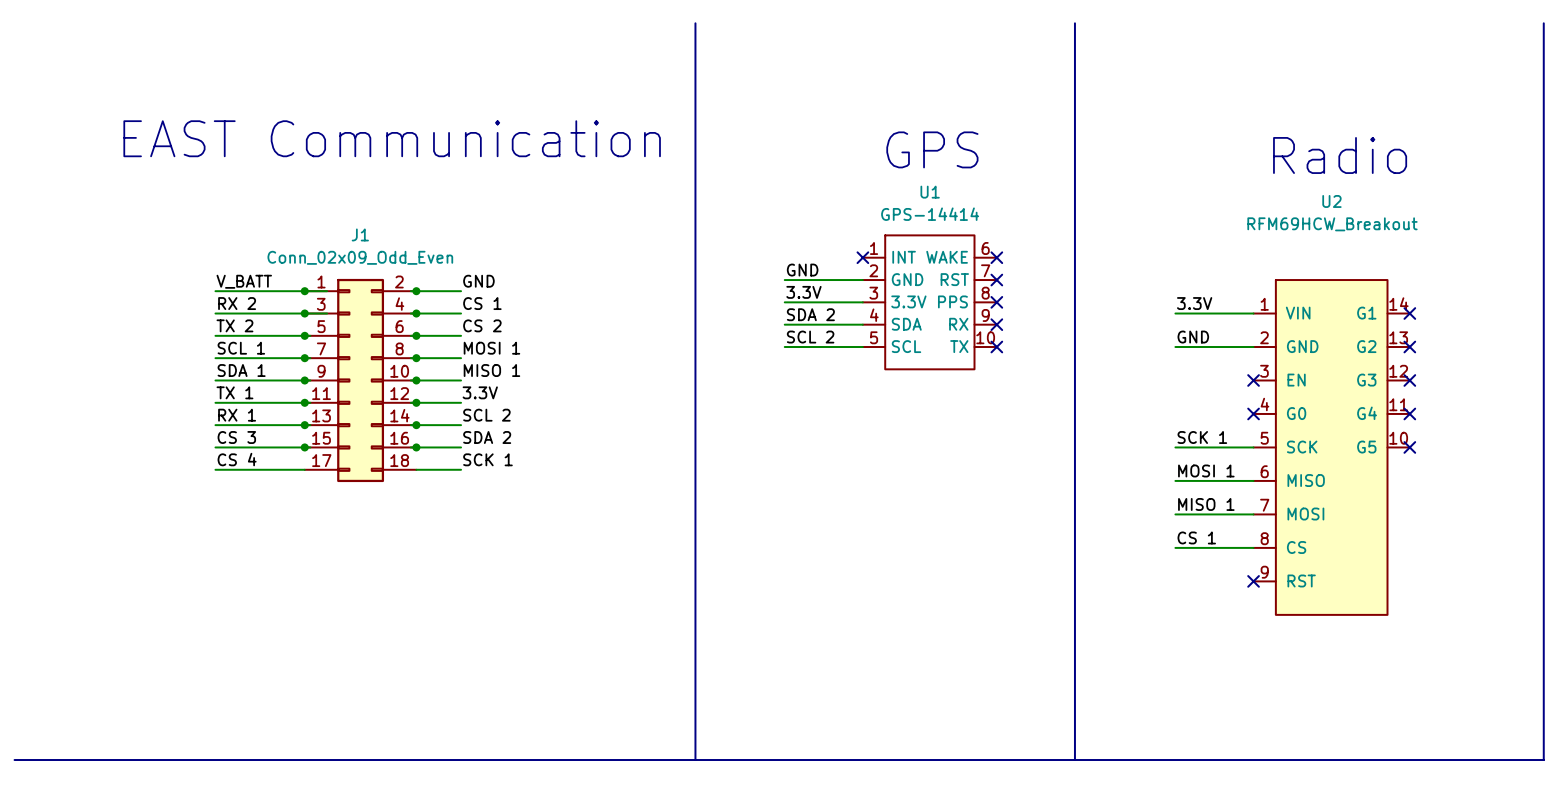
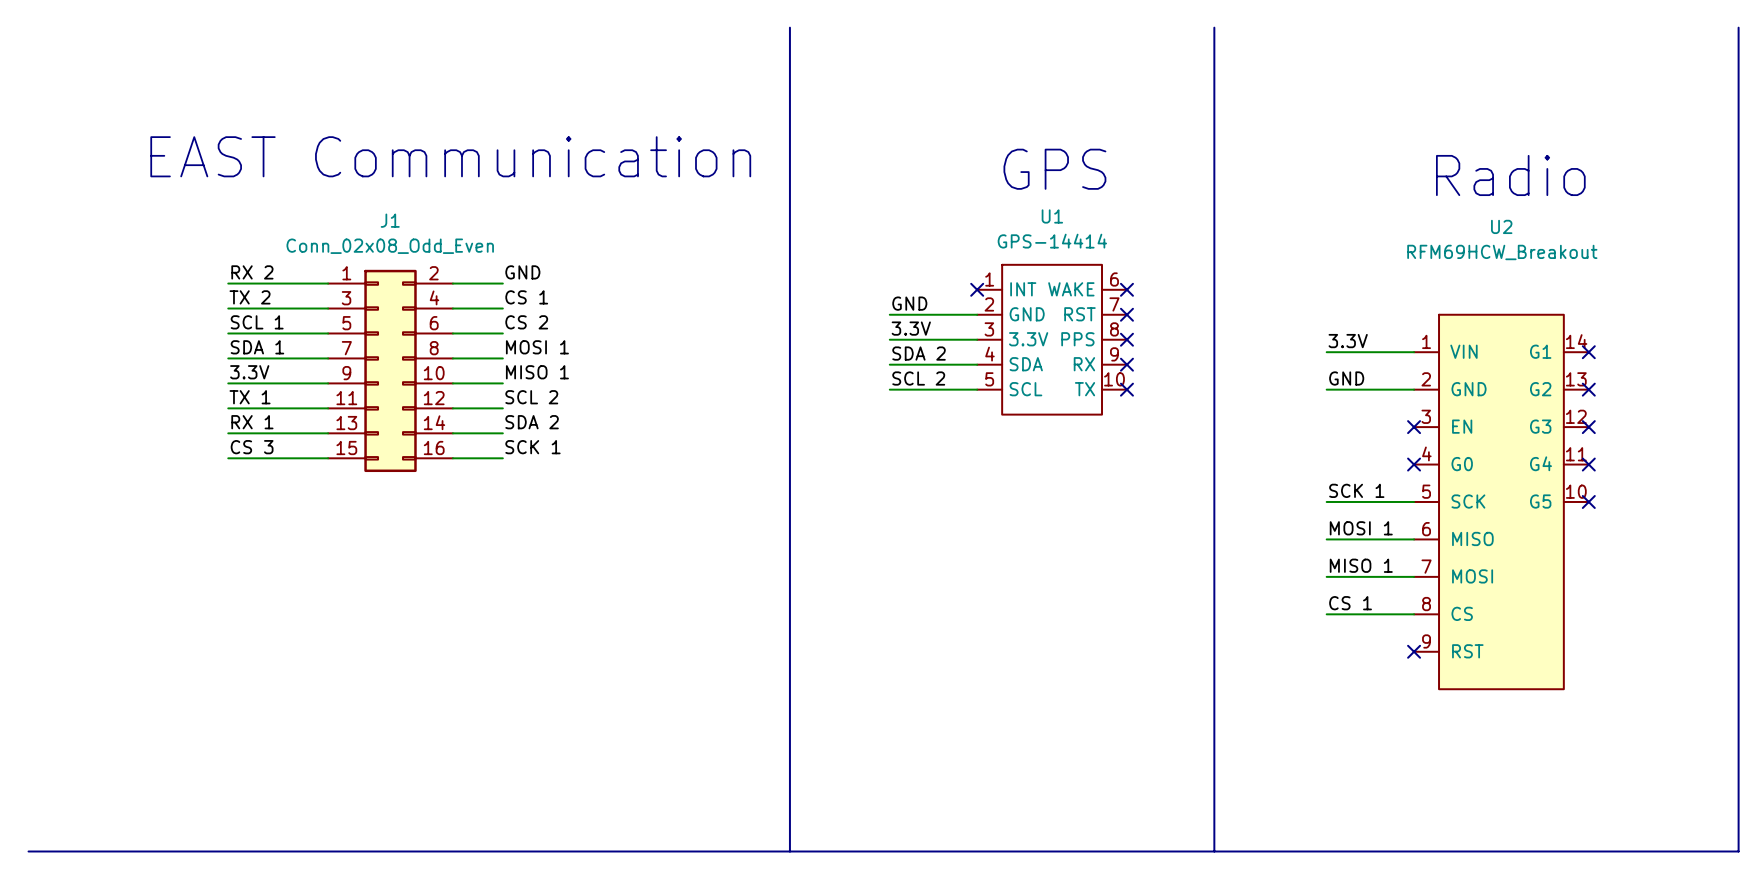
wire: none -> (228, 283) (328, 283)
wire: none -> (452, 283) (502, 283)
J1 value: Conn_02x09_Odd_Even (360, 257) -> Conn_02x08_Odd_Even (390, 246)
wire: none -> (228, 308) (328, 308)
wire: none -> (452, 308) (502, 308)
J1 symbol: [304, 278, 417, 483] -> [328, 269, 453, 473]
label: V_BATT (244, 281) -> none
label position: GND (478, 281) -> GND (522, 272)
wire: (215, 291) (327, 291) -> none
junction: (304, 291) -> none
wire: (410, 291) (461, 291) -> none
junction: (416, 291) -> none
wire: none -> (228, 333) (328, 333)
wire: none -> (452, 333) (502, 333)
label position: RX 2 (237, 303) -> RX 2 (252, 272)
label position: CS 1 (482, 303) -> CS 1 (526, 297)
wire: (215, 313) (327, 313) -> none
junction: (304, 313) -> none
wire: (410, 313) (461, 313) -> none
junction: (416, 313) -> none
wire: none -> (228, 358) (328, 358)
wire: none -> (452, 358) (502, 358)
label position: TX 2 (234, 325) -> TX 2 (250, 297)
label position: CS 2 (482, 325) -> CS 2 (526, 322)
label: none -> 3.3V (249, 372)
wire: (215, 335) (310, 335) -> none
junction: (304, 335) -> none
wire: (410, 335) (461, 335) -> none
junction: (416, 335) -> none
wire: none -> (228, 383) (328, 383)
wire: none -> (452, 383) (502, 383)
label position: SCL 1 (241, 348) -> SCL 1 (257, 322)
label position: MOSI 1 (491, 348) -> MOSI 1 (537, 347)
wire: (215, 358) (310, 358) -> none
junction: (304, 358) -> none
wire: (410, 358) (461, 358) -> none
junction: (416, 358) -> none
wire: none -> (228, 408) (328, 408)
wire: none -> (452, 408) (502, 408)
label position: SDA 1 (241, 370) -> SDA 1 (257, 347)
label position: MISO 1 (491, 370) -> MISO 1 (537, 372)
wire: (215, 380) (310, 380) -> none
junction: (304, 380) -> none
wire: (410, 380) (461, 380) -> none
junction: (416, 380) -> none
wire: none -> (228, 433) (328, 433)
wire: none -> (452, 433) (502, 433)
label position: TX 1 (234, 392) -> TX 1 (250, 397)
label: 3.3V (480, 392) -> none
wire: (215, 402) (310, 402) -> none
junction: (304, 402) -> none
wire: (410, 402) (461, 402) -> none
junction: (416, 402) -> none
label position: RX 1 (237, 415) -> RX 1 (252, 422)
label position: SCL 2 (486, 415) -> SCL 2 (531, 397)
wire: (215, 425) (310, 425) -> none
junction: (304, 425) -> none
wire: (410, 425) (461, 425) -> none
junction: (416, 425) -> none
label position: CS 3 (236, 437) -> CS 3 (252, 447)
label position: SDA 2 (487, 437) -> SDA 2 (532, 422)
wire: (215, 447) (310, 447) -> none
junction: (304, 447) -> none
wire: (410, 447) (461, 447) -> none
junction: (416, 447) -> none
label: CS 4 (237, 459) -> none
label position: SCK 1 (487, 459) -> SCK 1 (532, 447)
wire: (215, 469) (304, 469) -> (228, 458) (328, 458)
wire: (416, 469) (461, 469) -> (452, 458) (502, 458)

